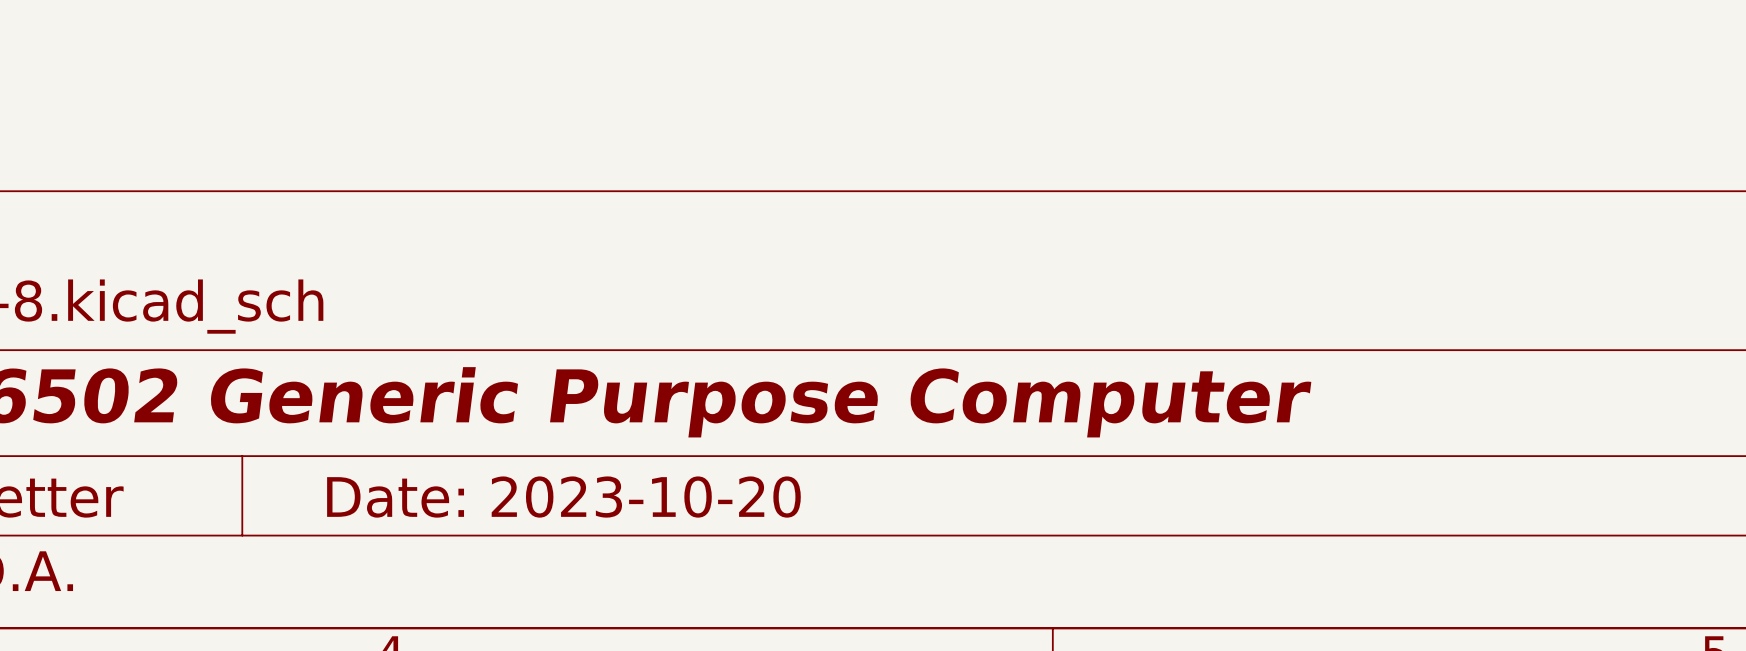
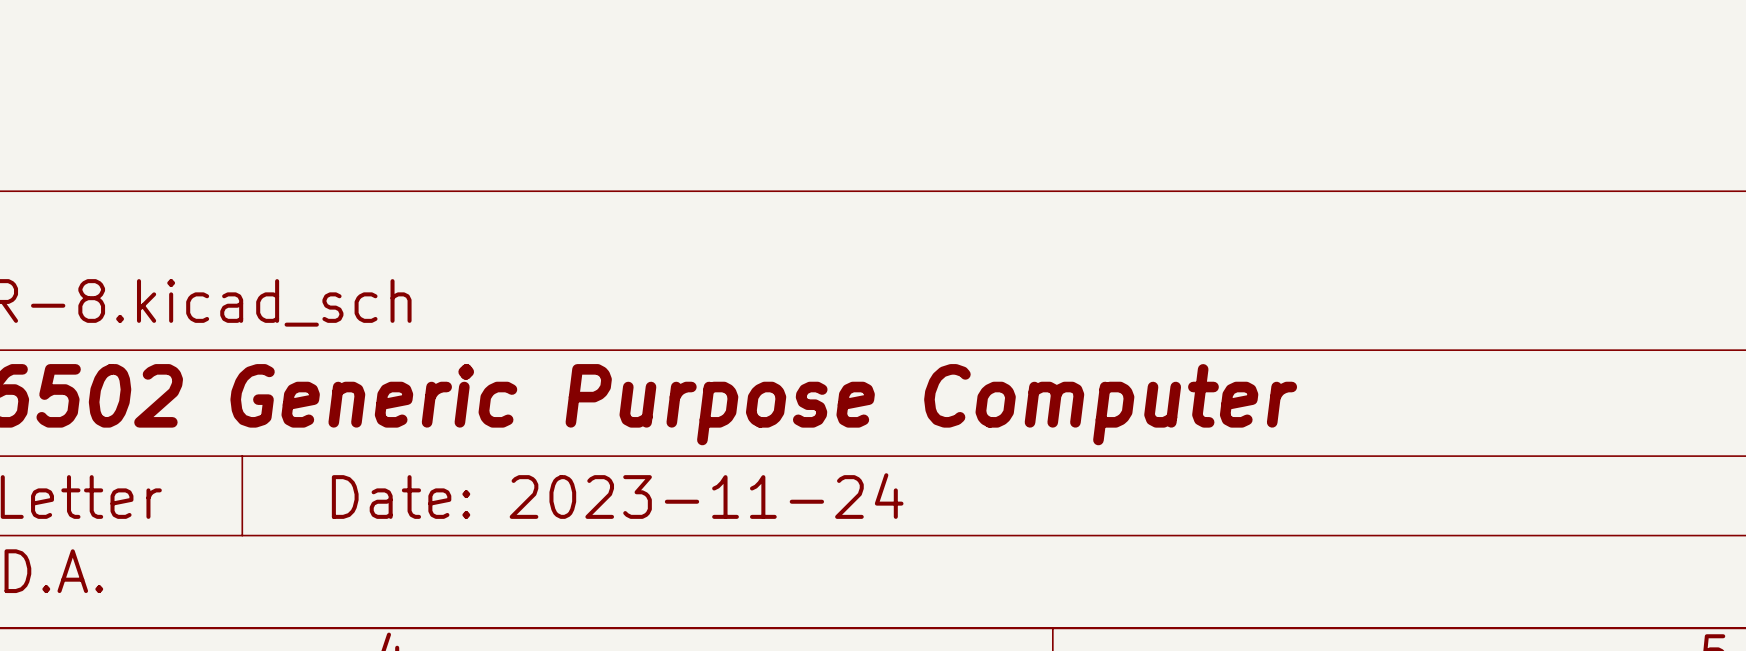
title block: Date: 2023-10-20 (563, 497) -> Date: 2023-11-24 (617, 496)

